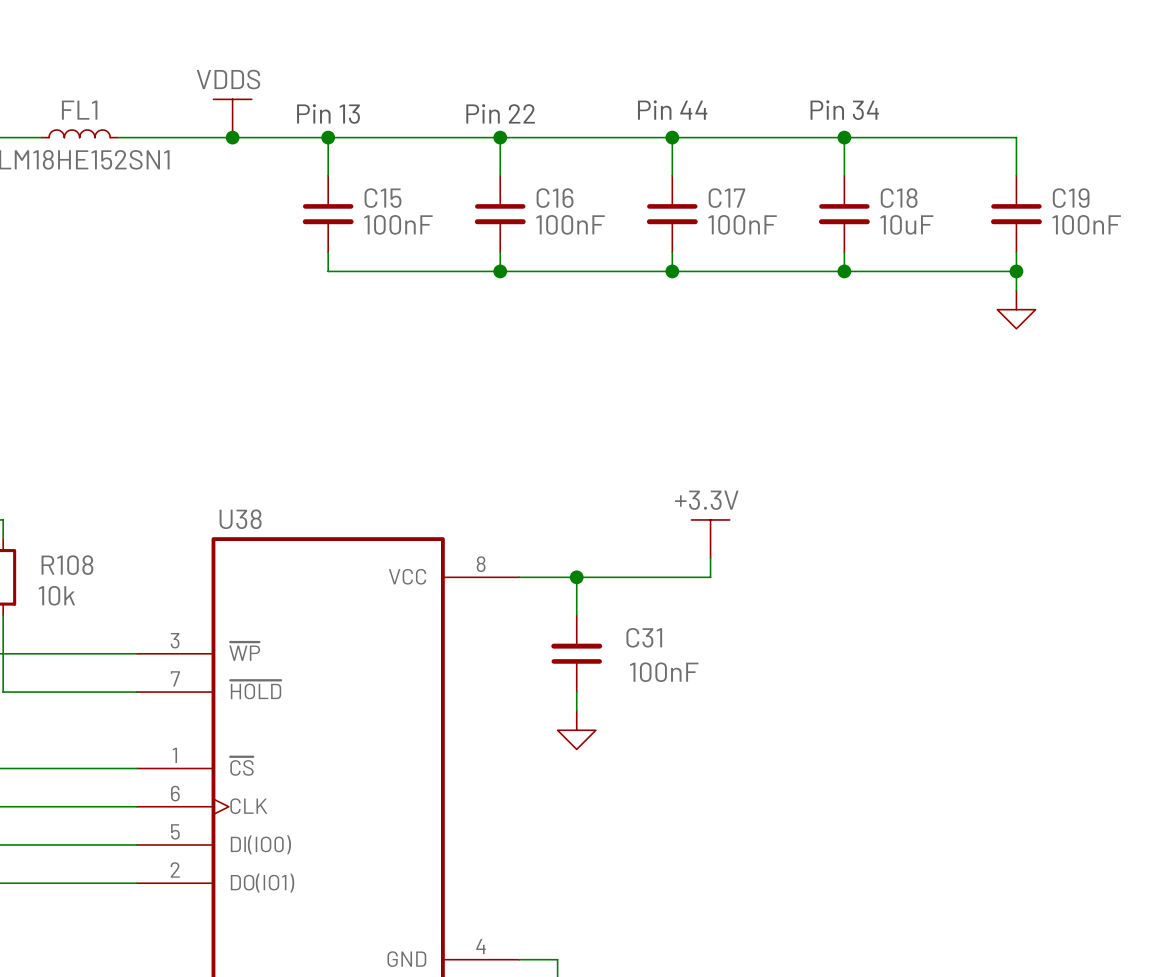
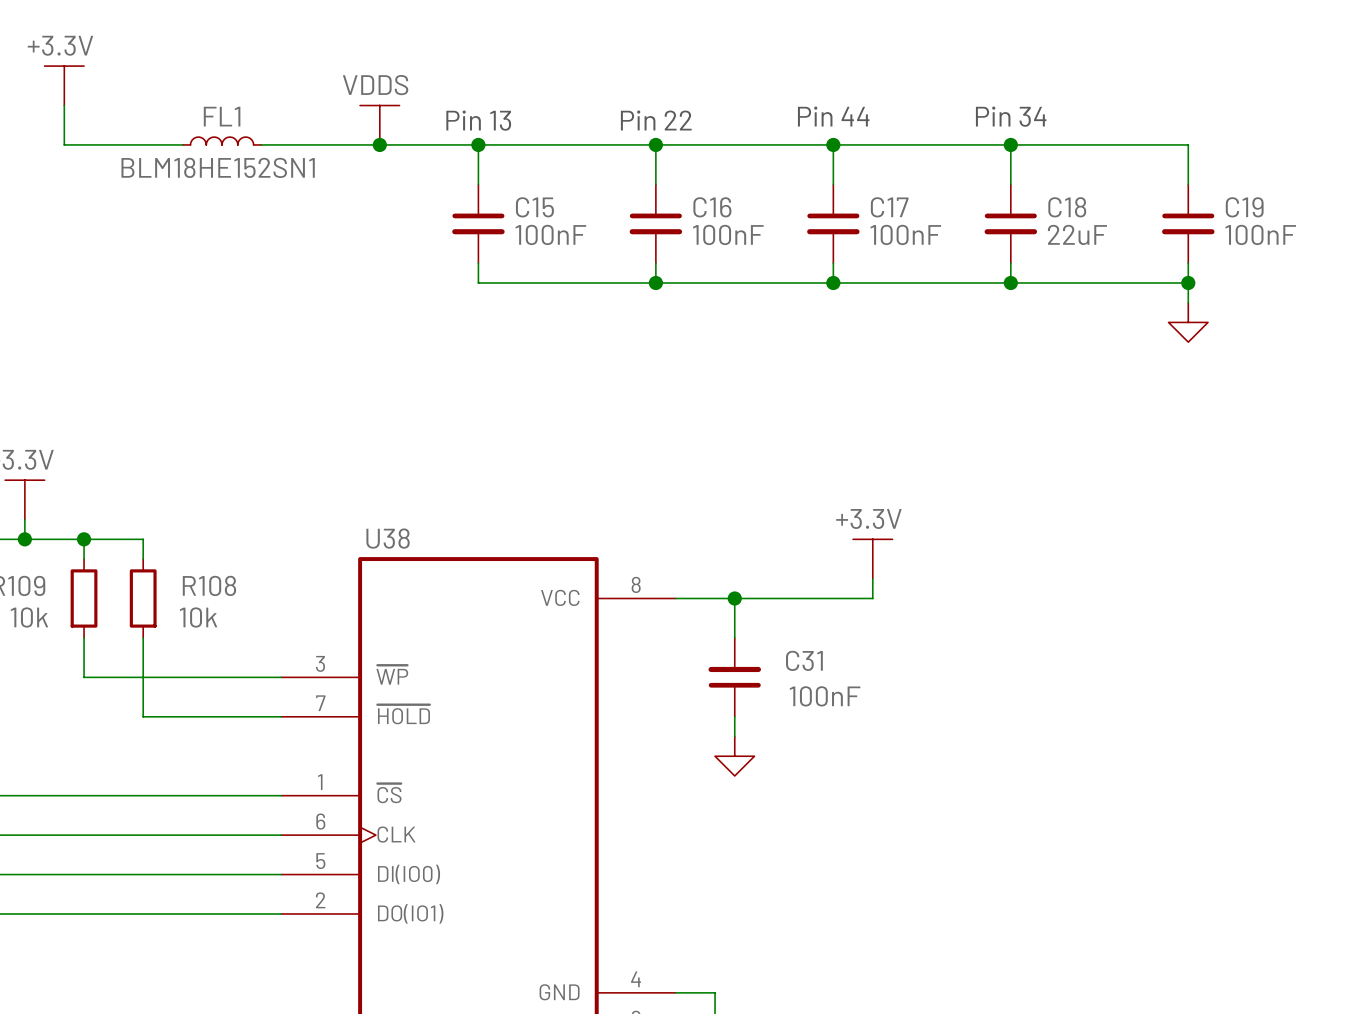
C18 value: 10uF (906, 224) -> 22uF (1077, 234)

